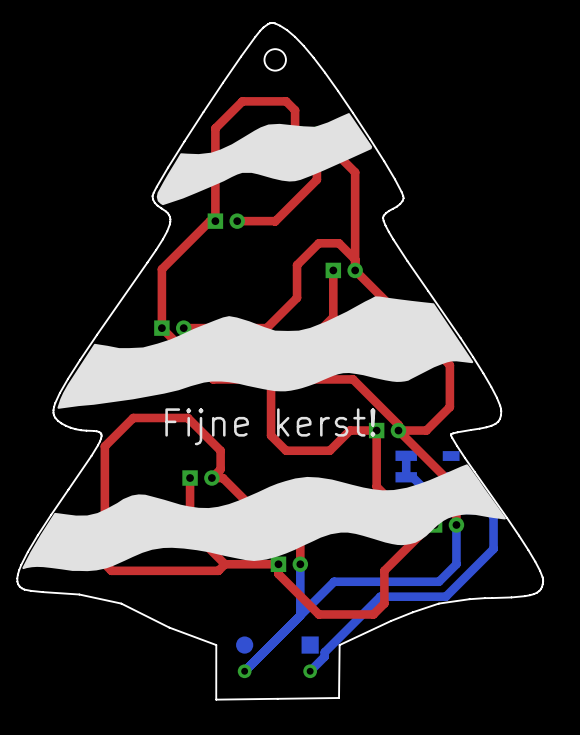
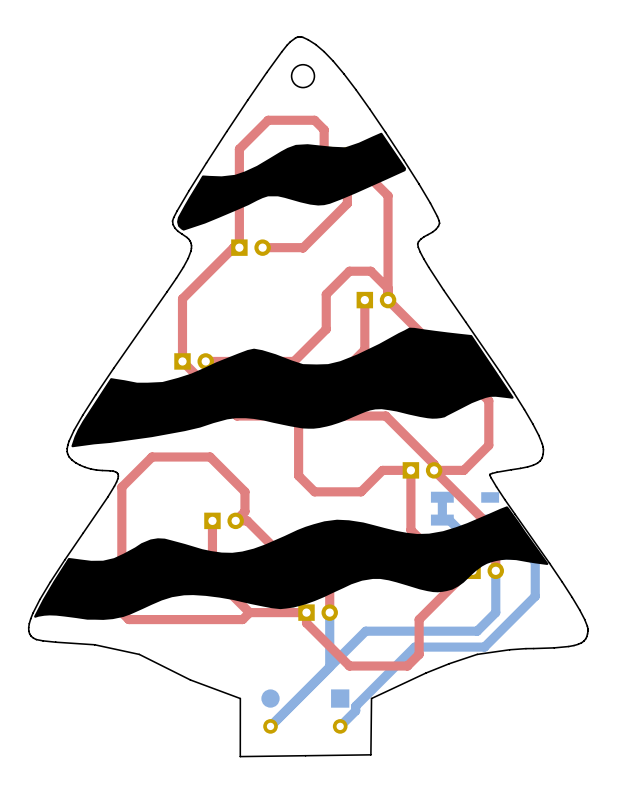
text: Fijne kerst! (270, 426) -> none

